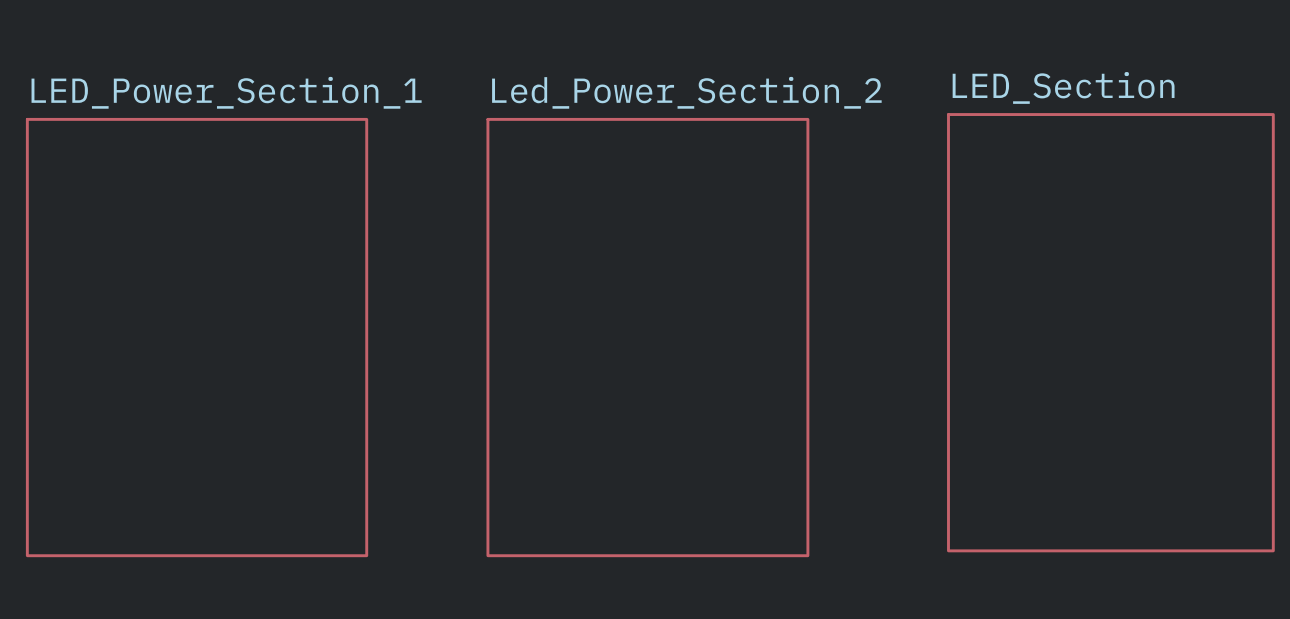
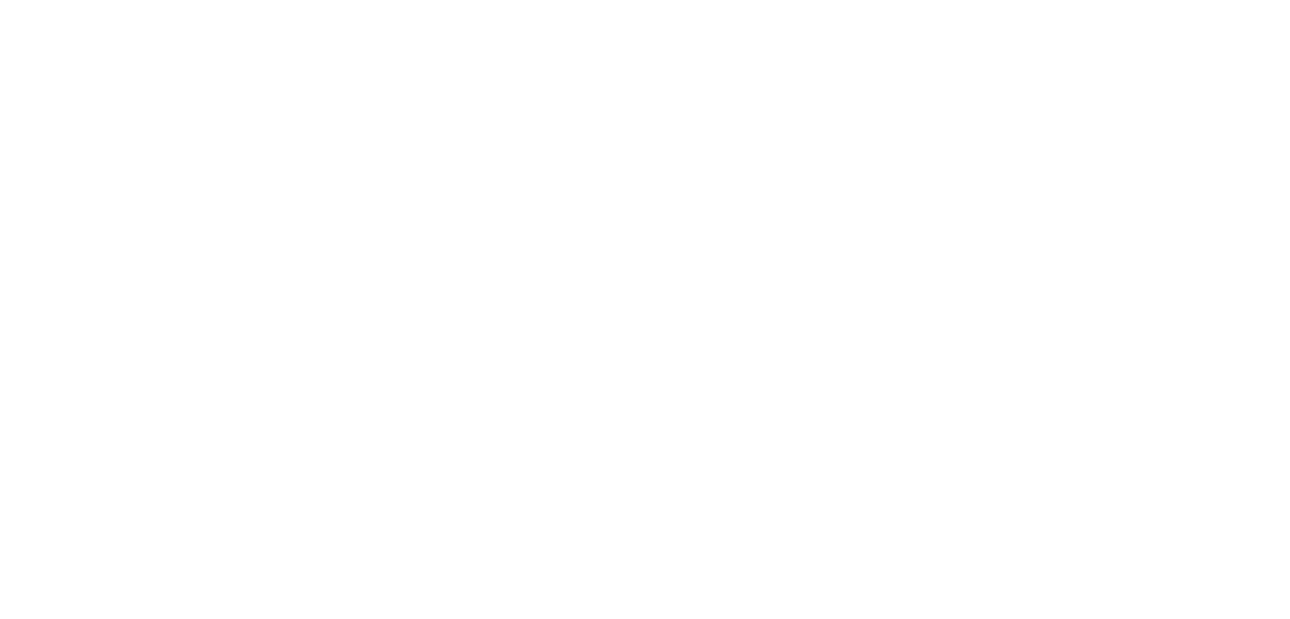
sheet LED_Section: (1110, 332) -> none
sheet LED_Power_Section_1: (197, 337) -> none
sheet Led_Power_Section_2: (647, 337) -> none

